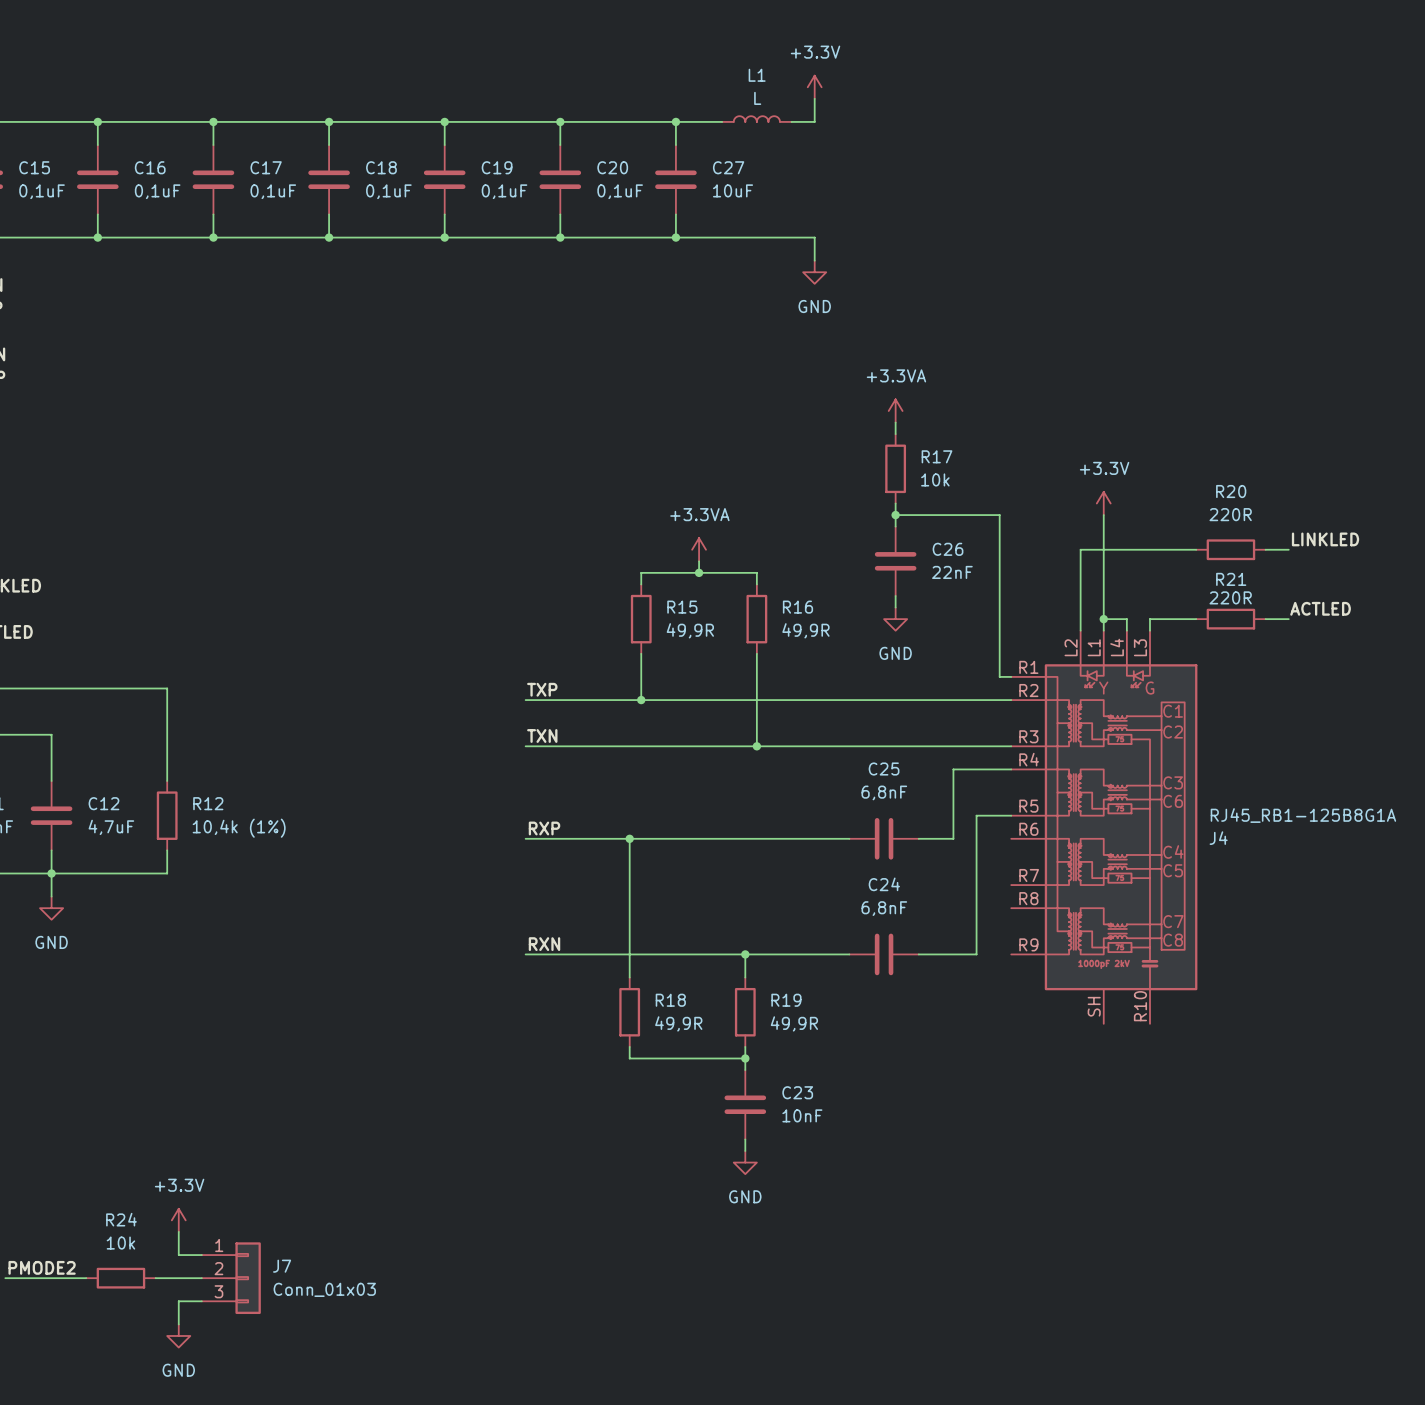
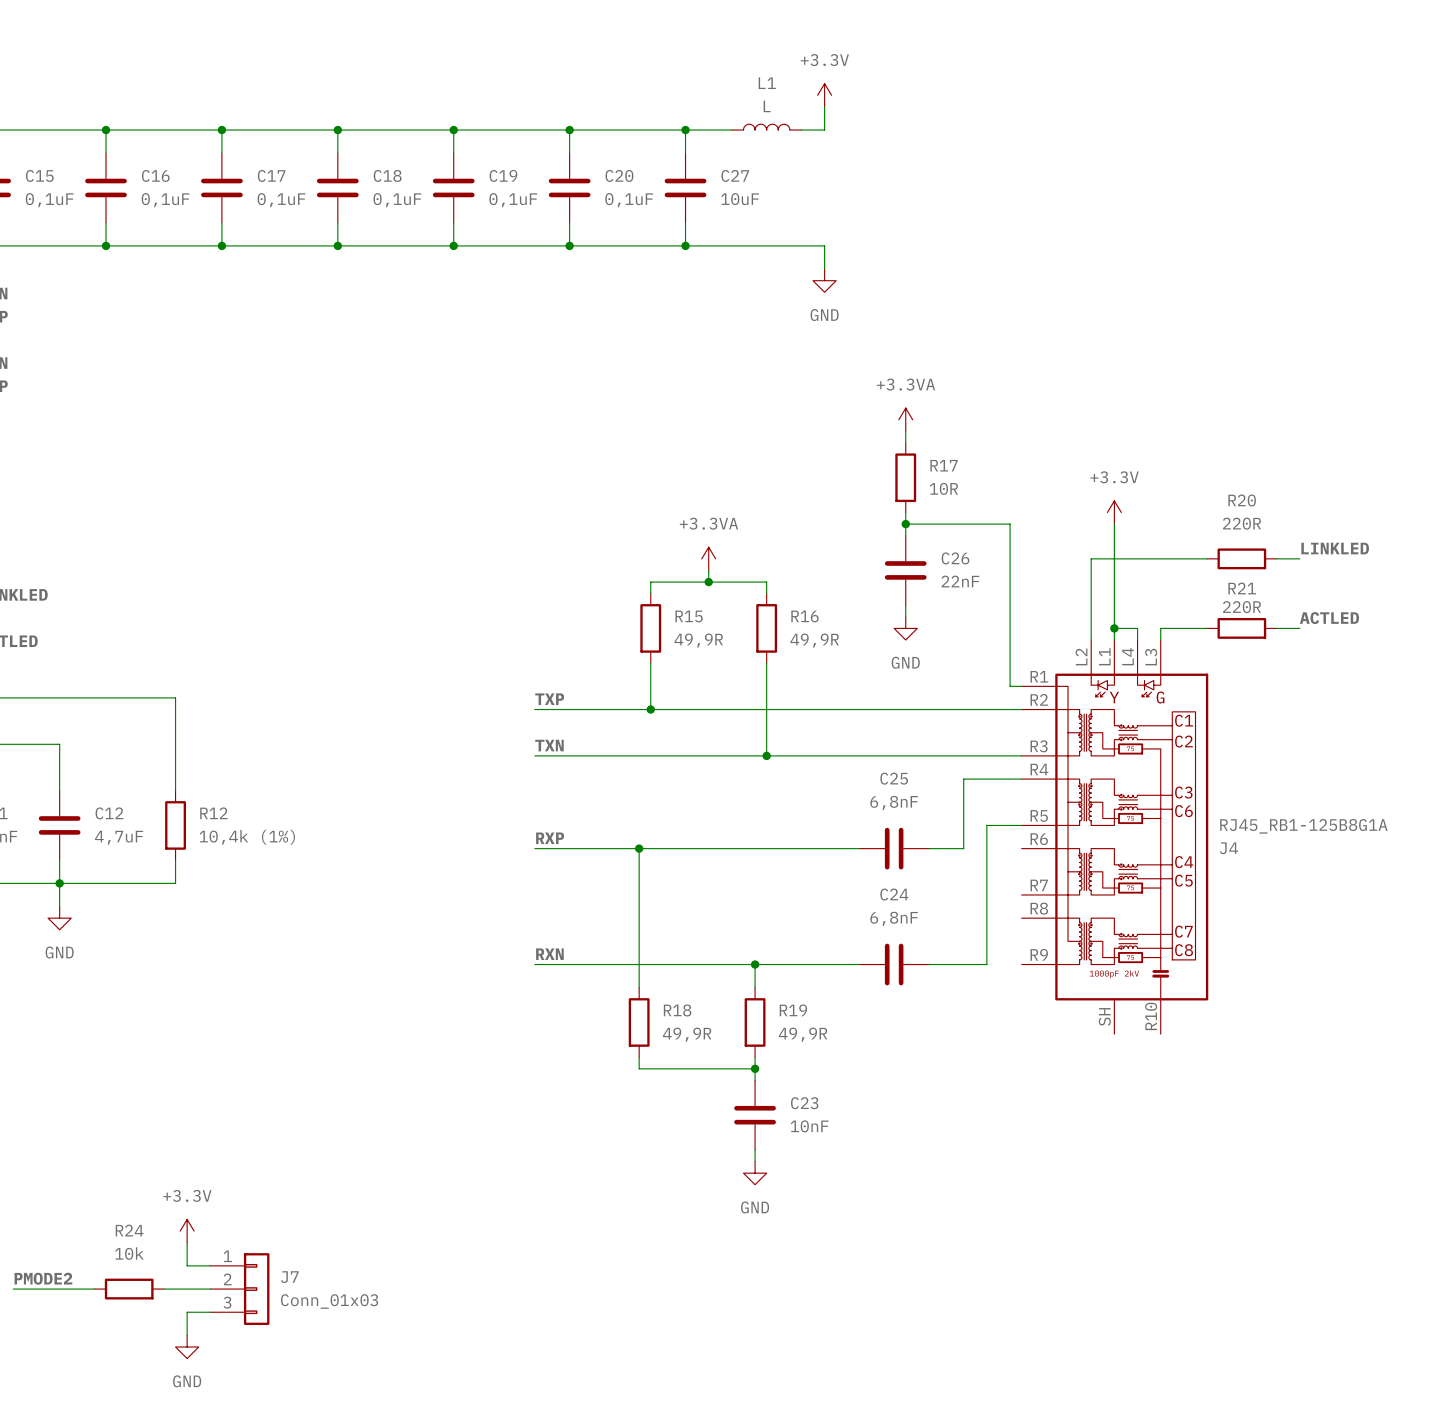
R17 value: 10k (935, 479) -> 10R (943, 488)

